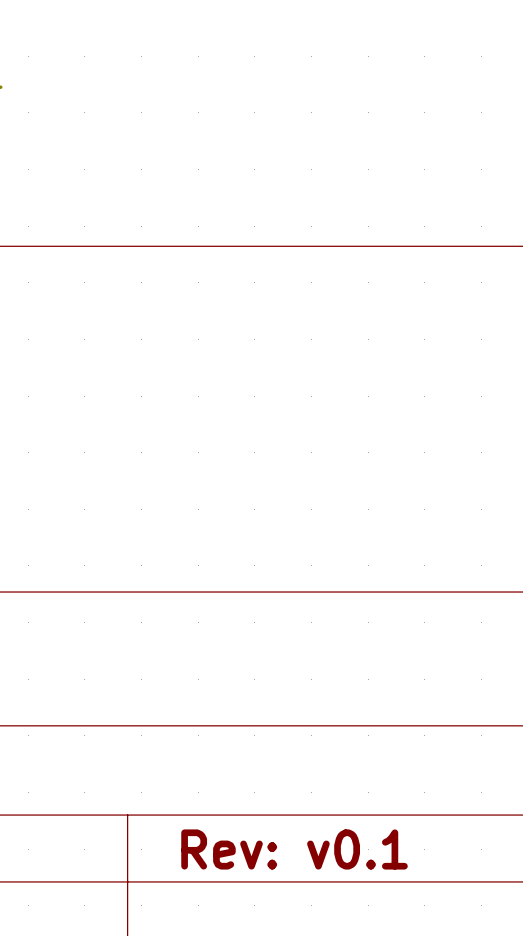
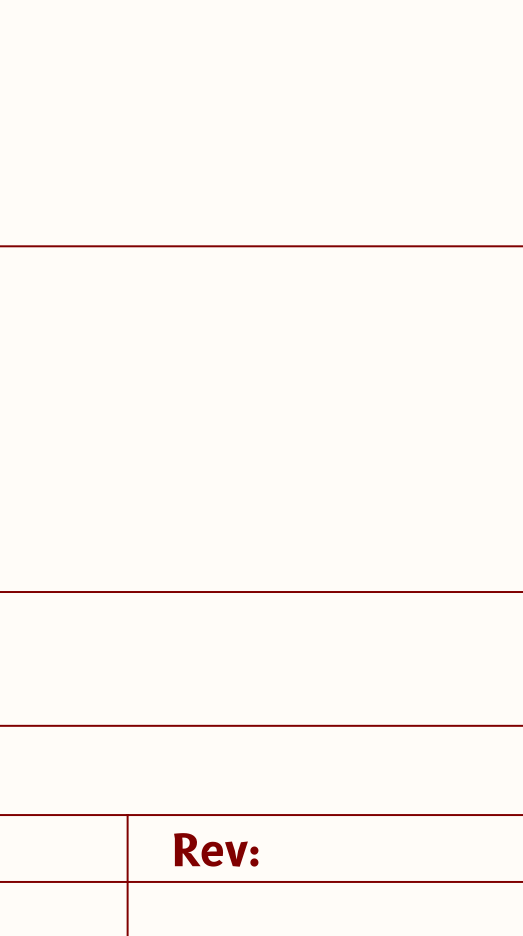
title block: Rev: v0.1 (294, 849) -> Rev: (216, 849)

